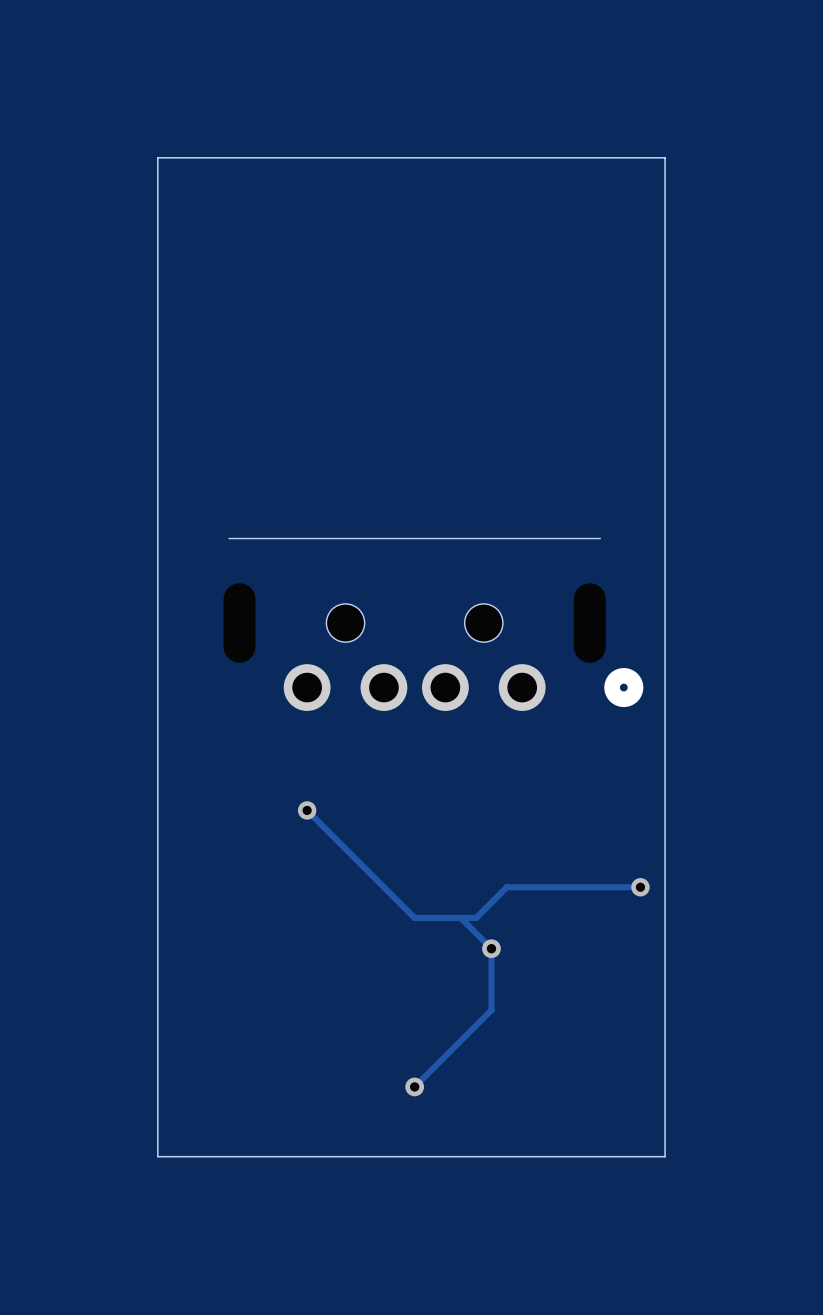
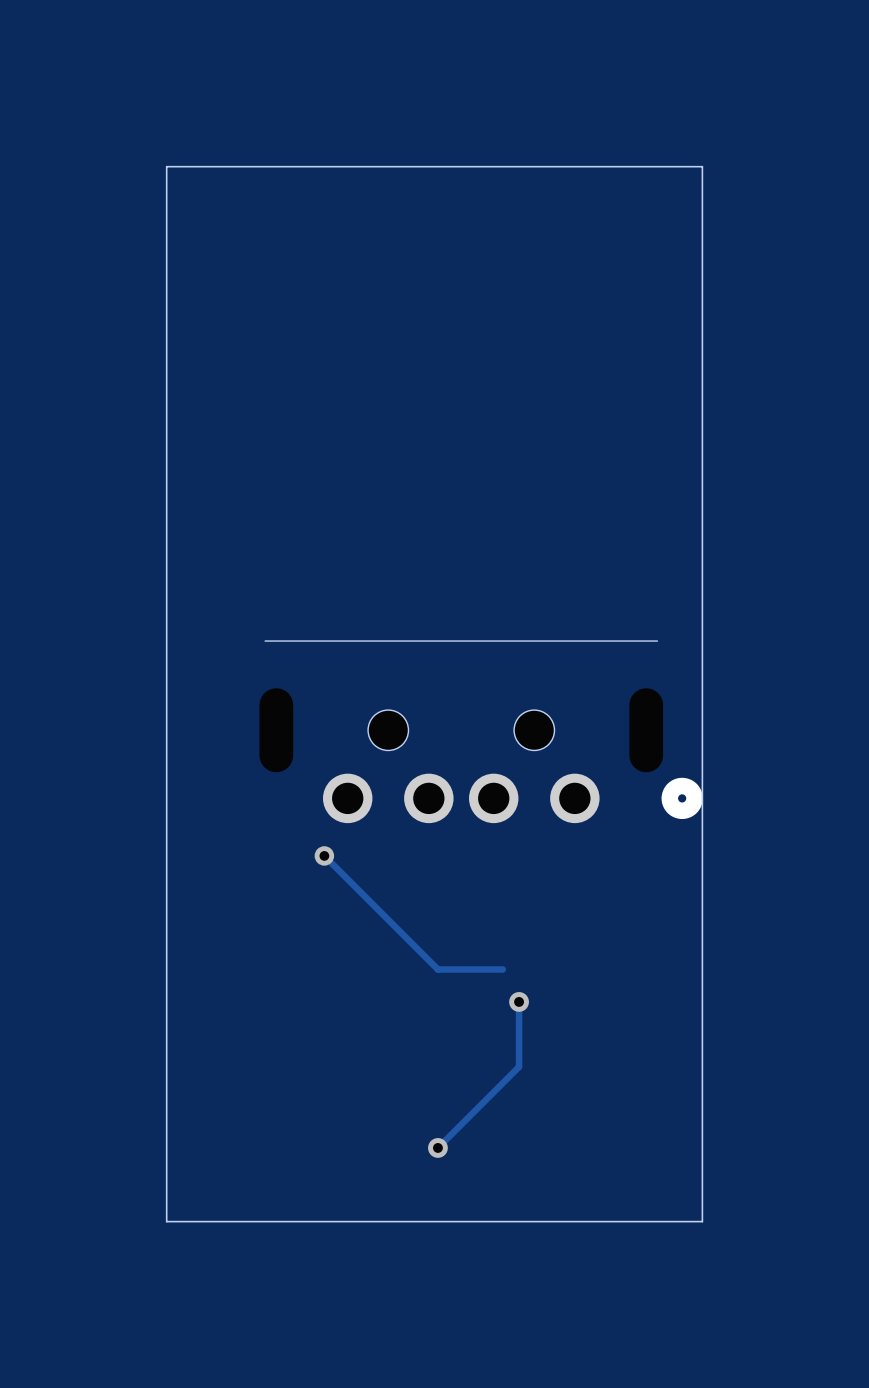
part position: (433, 624) -> (481, 731)
track: (640, 887) (506, 887) (476, 917) -> none
via: (640, 887) -> none
track: (460, 917) (491, 948) -> none

